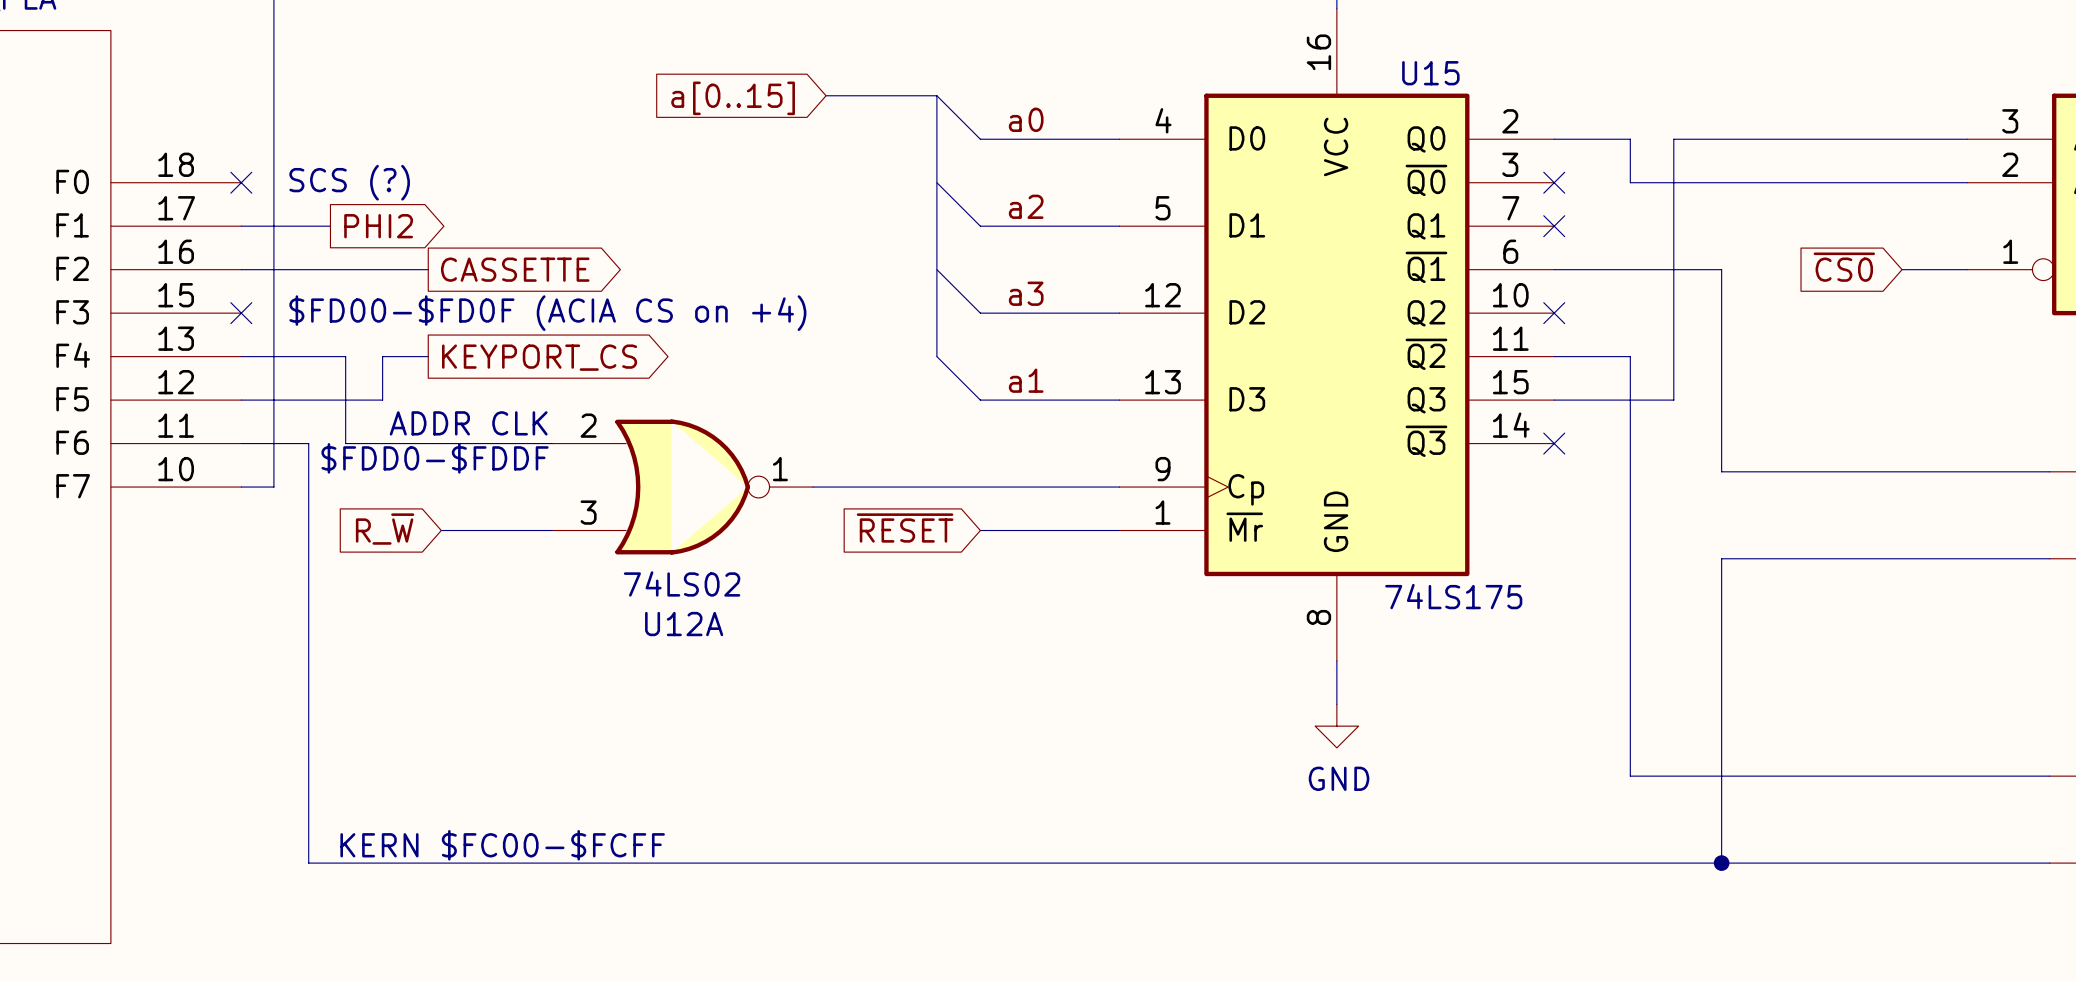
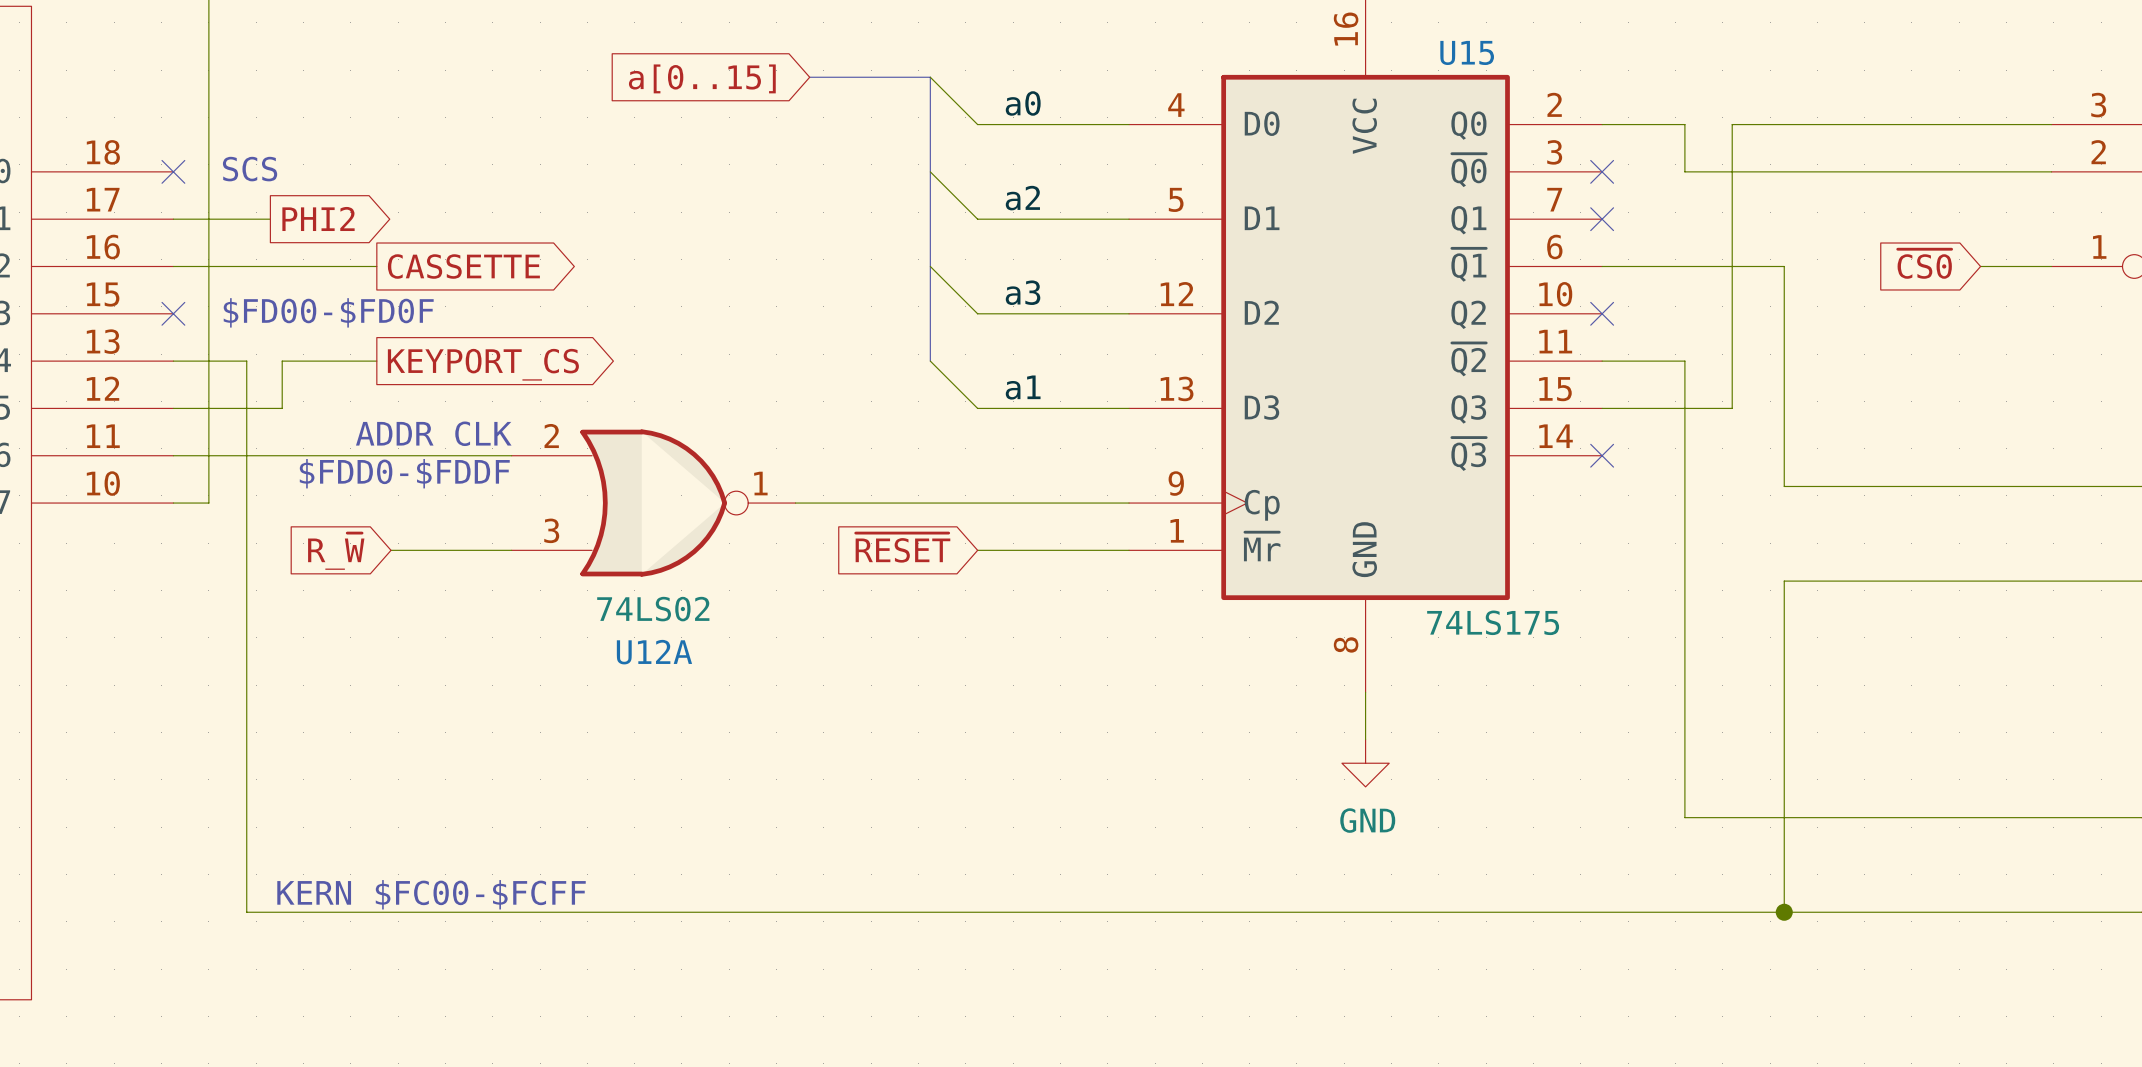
text: SCS (?) (349, 182) -> SCS (250, 169)
text: $FD00-$FD0F (ACIA CS on +4) (547, 313) -> $FD00-$FD0F (328, 312)
wire: (308, 356) (341, 356) -> none
wire: (345, 356) (345, 443) -> (246, 361) (246, 455) (286, 455)
wire: none -> (286, 361) (327, 361)
wire: (382, 356) (382, 400) (341, 400) -> (282, 361) (282, 408)

